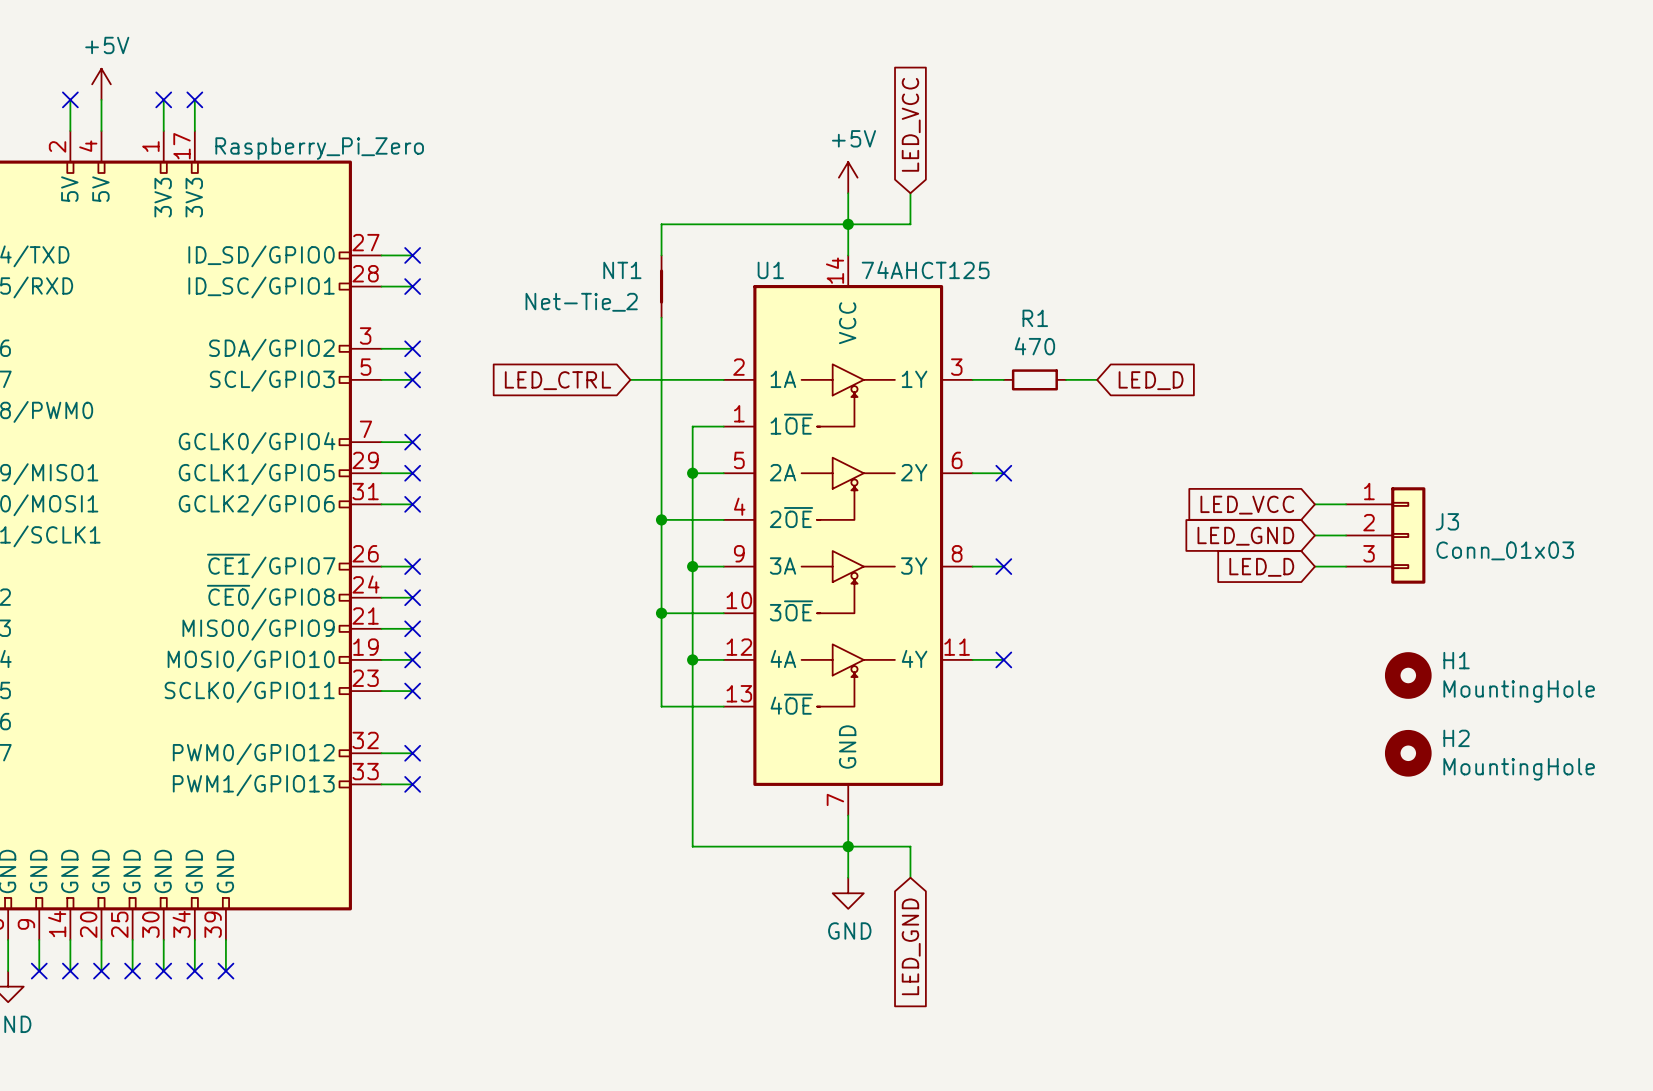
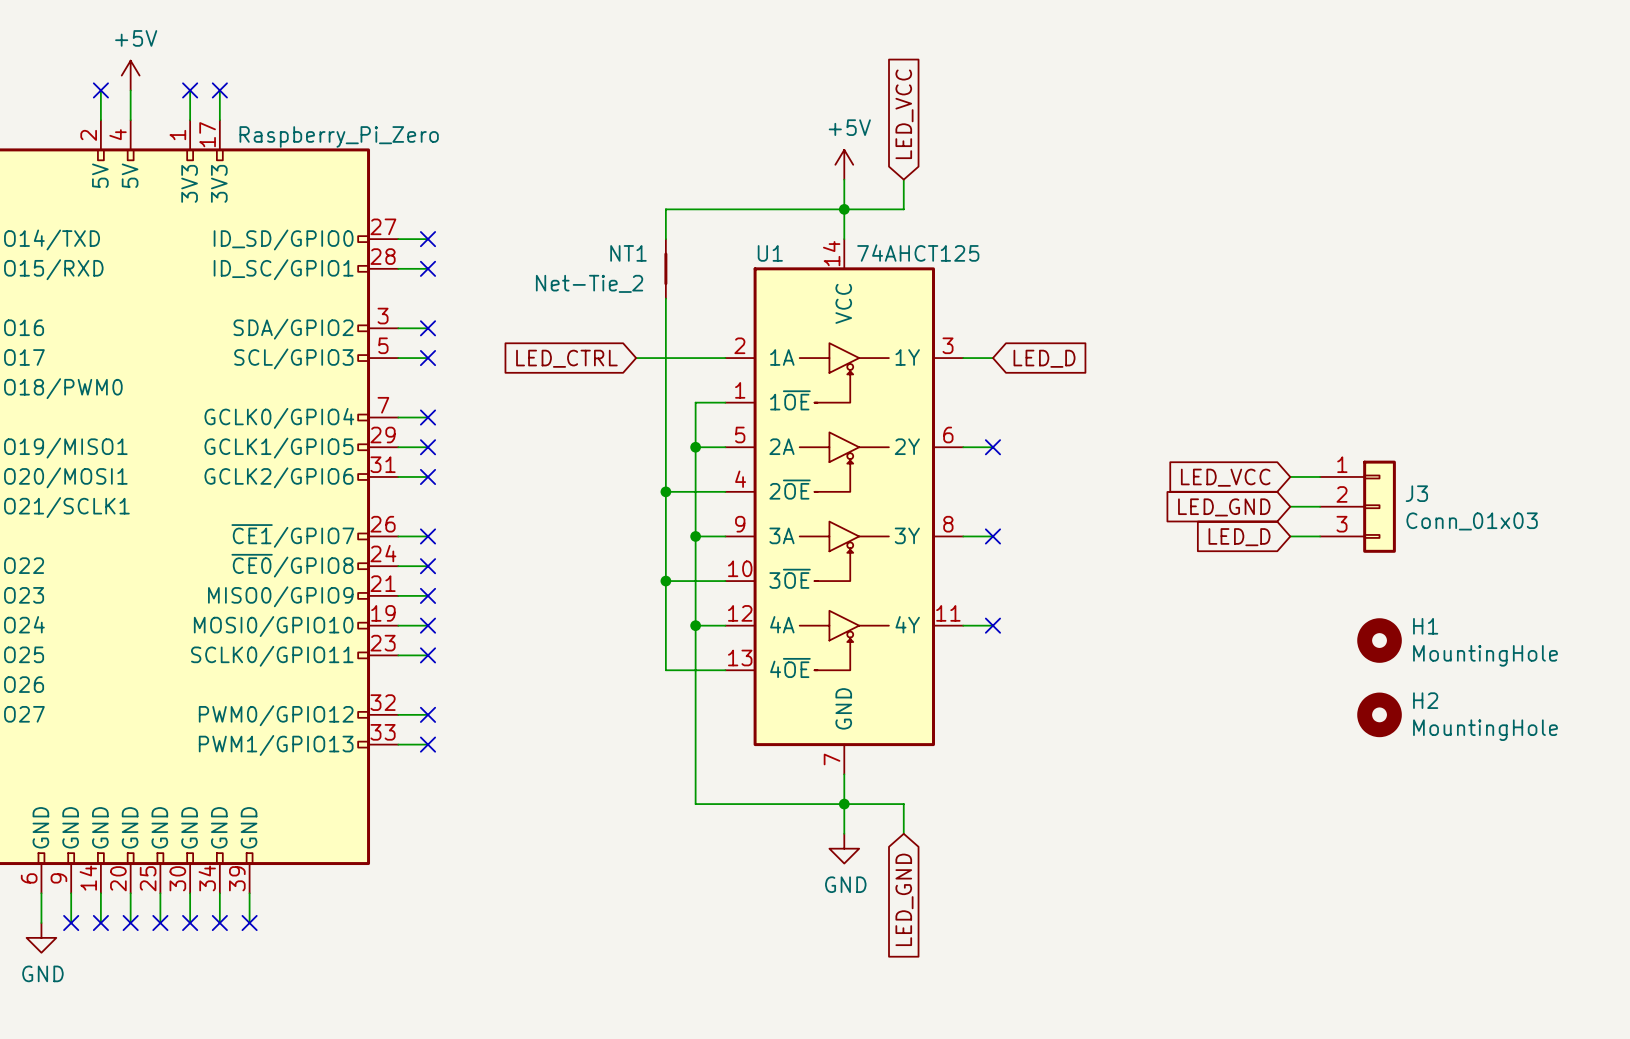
R1: 470 (1034, 379) -> none
wire: (1066, 379) (1097, 379) -> none
global label position: LED_D (1151, 380) -> LED_D (1044, 358)

